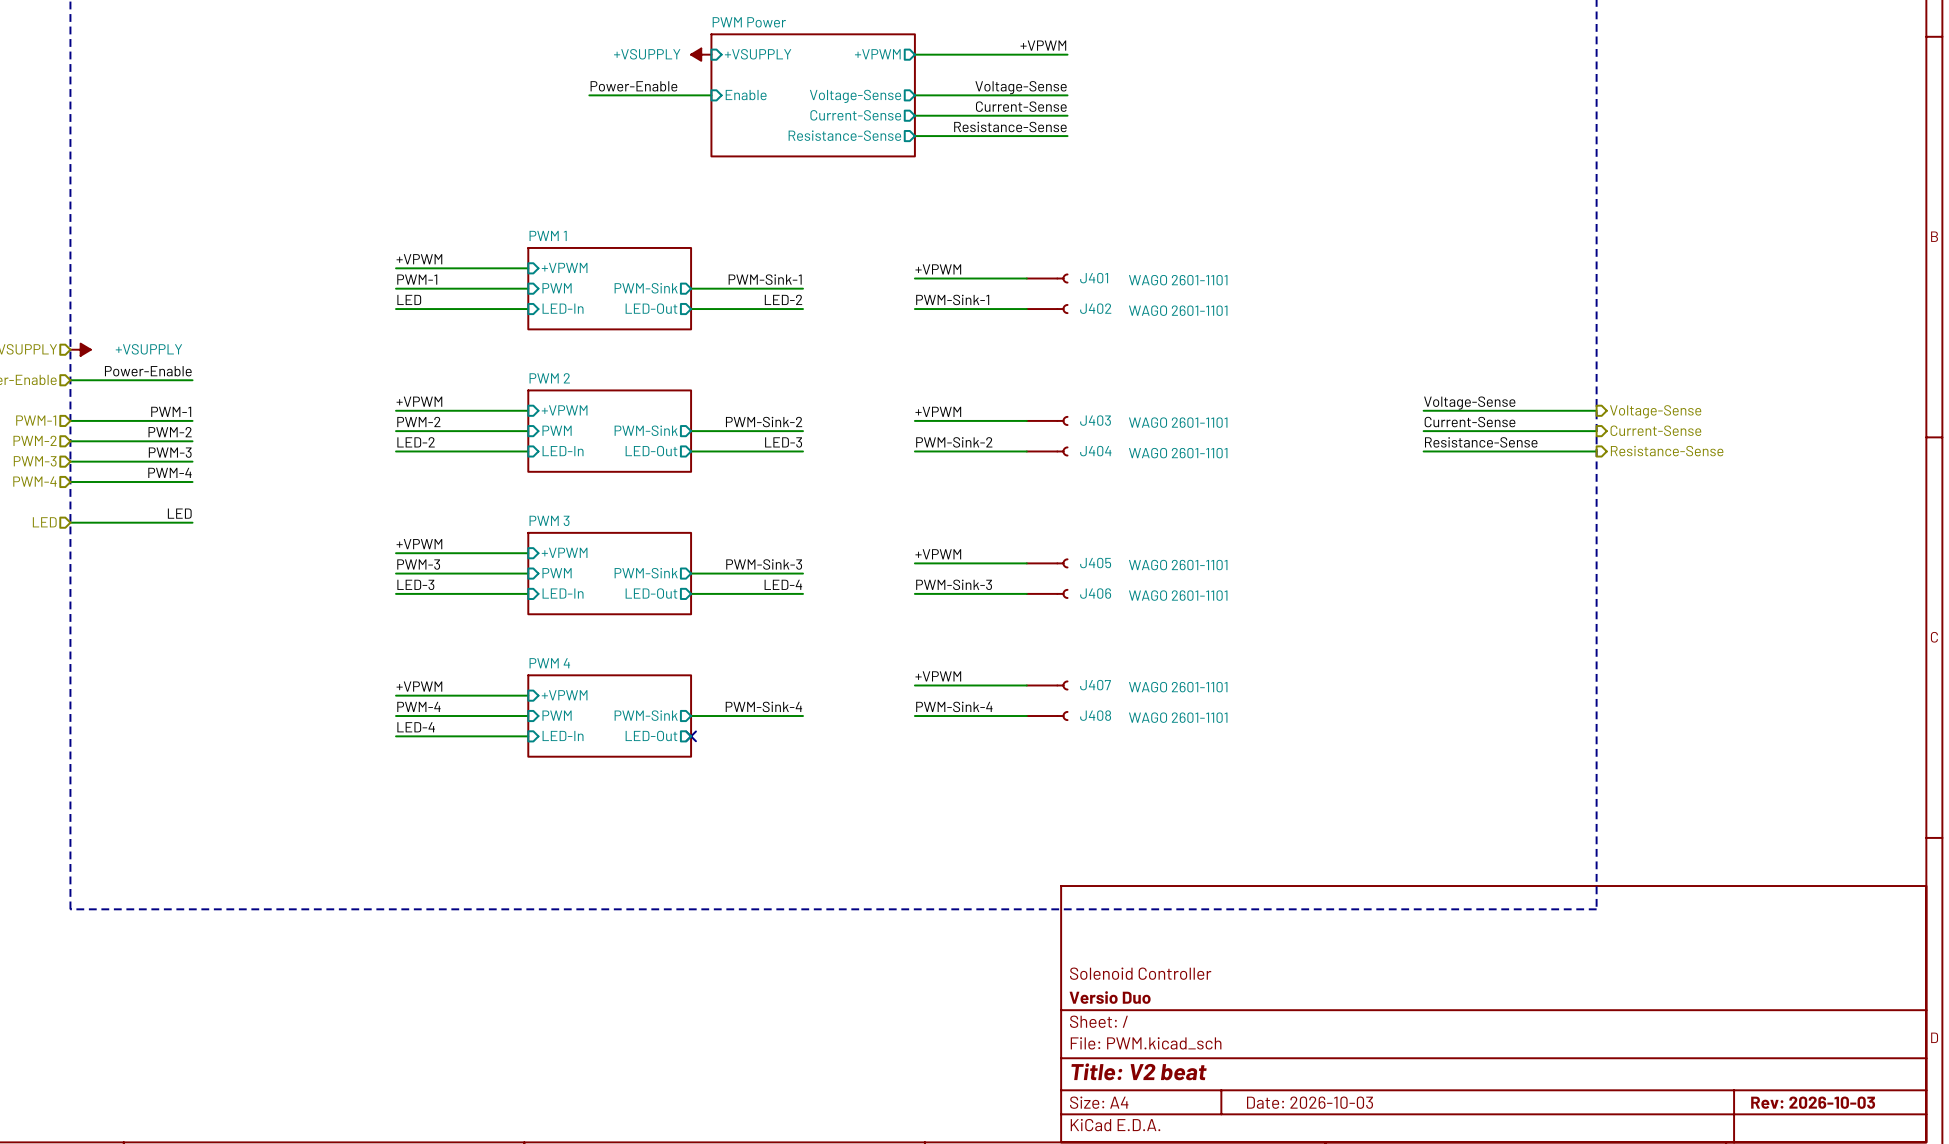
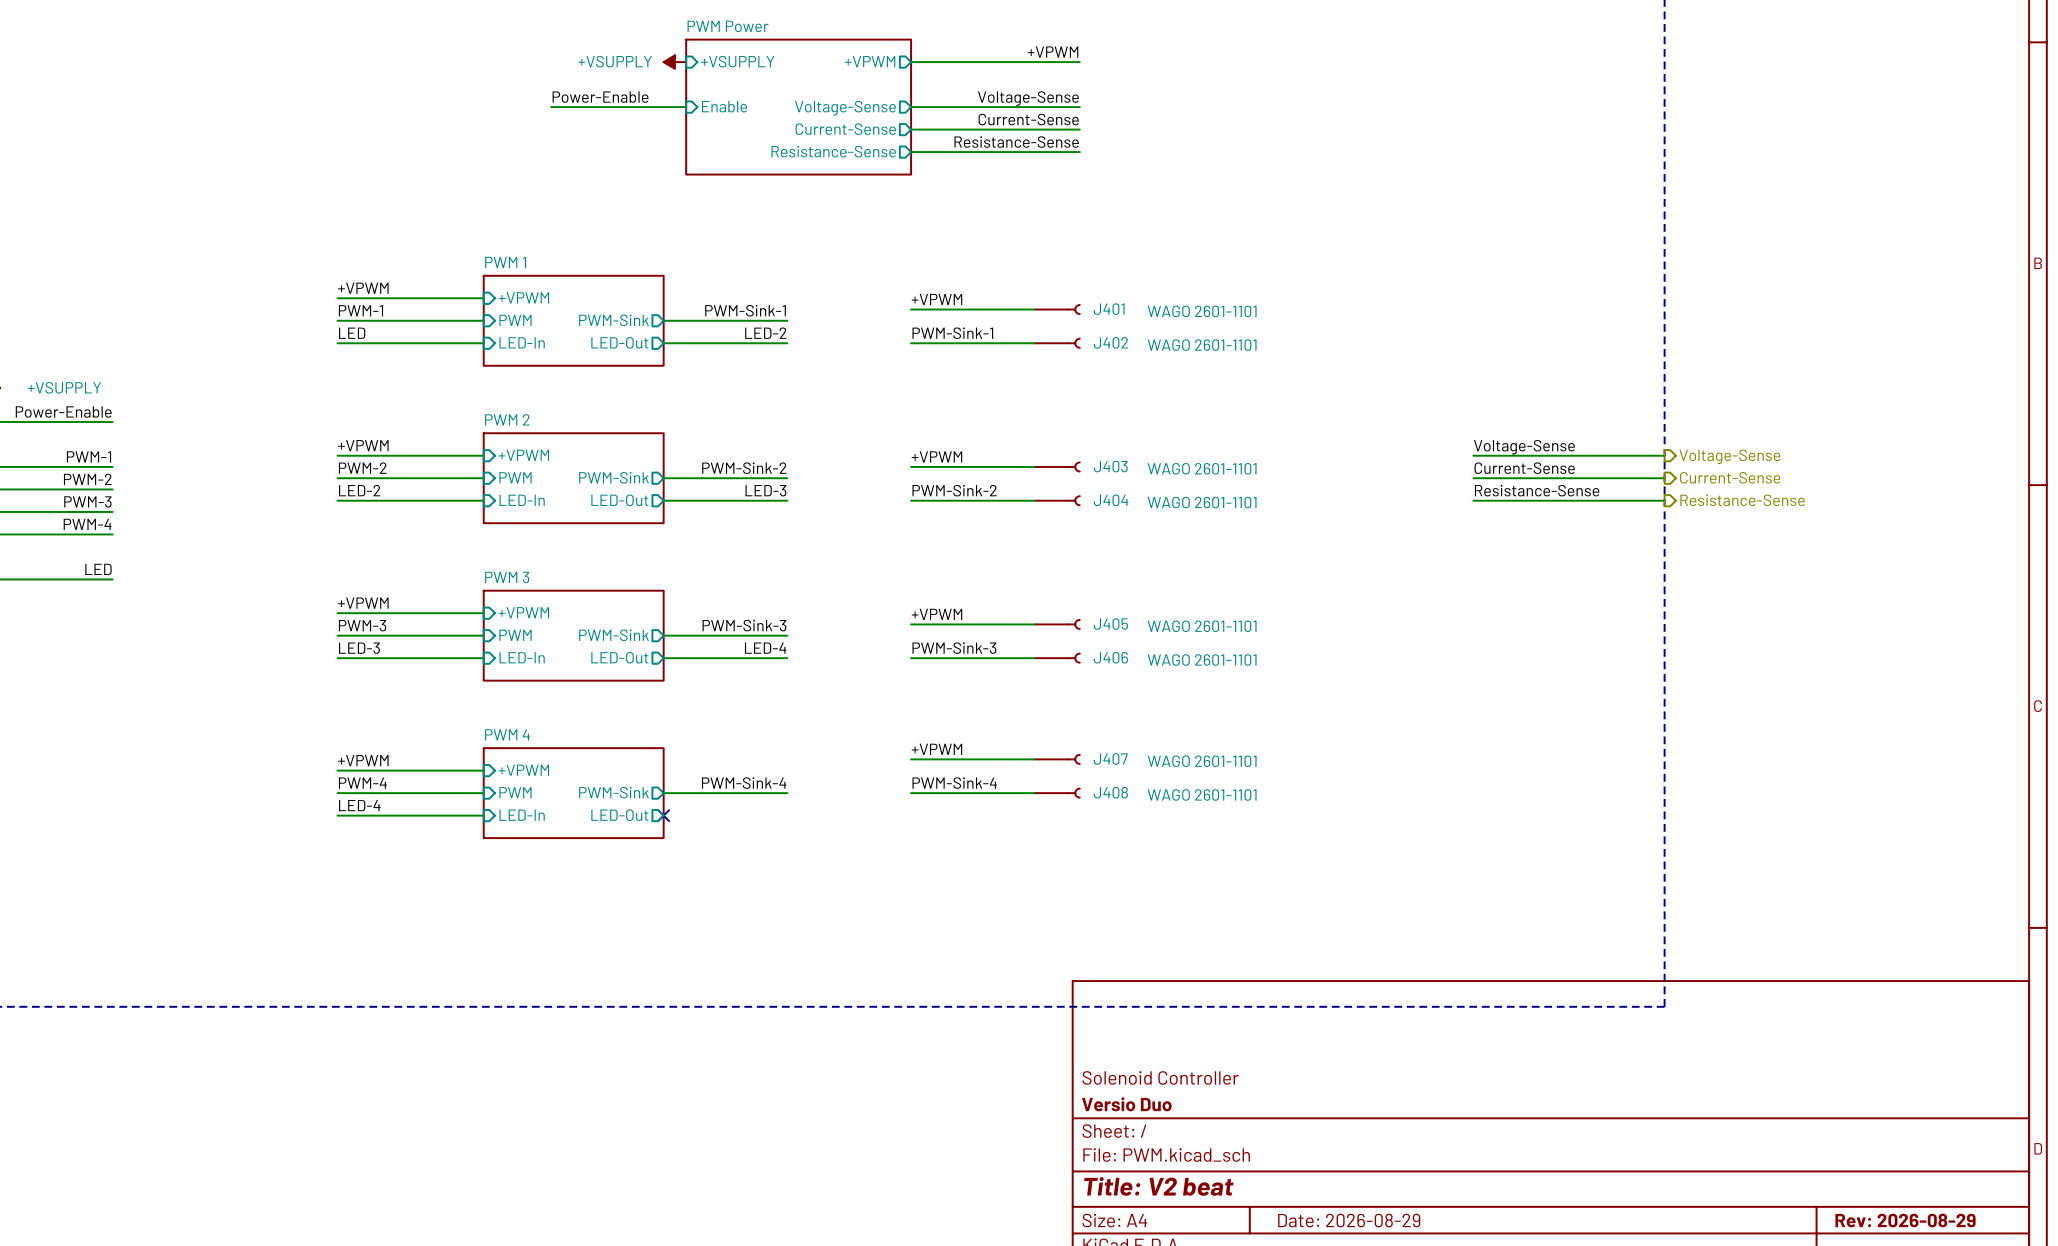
title block: Date: 2026-10-03 (1310, 1102) -> Date: 2026-08-29 (1349, 1220)
title block: Rev: 2026-10-03 (1813, 1102) -> Rev: 2026-08-29 (1905, 1220)

